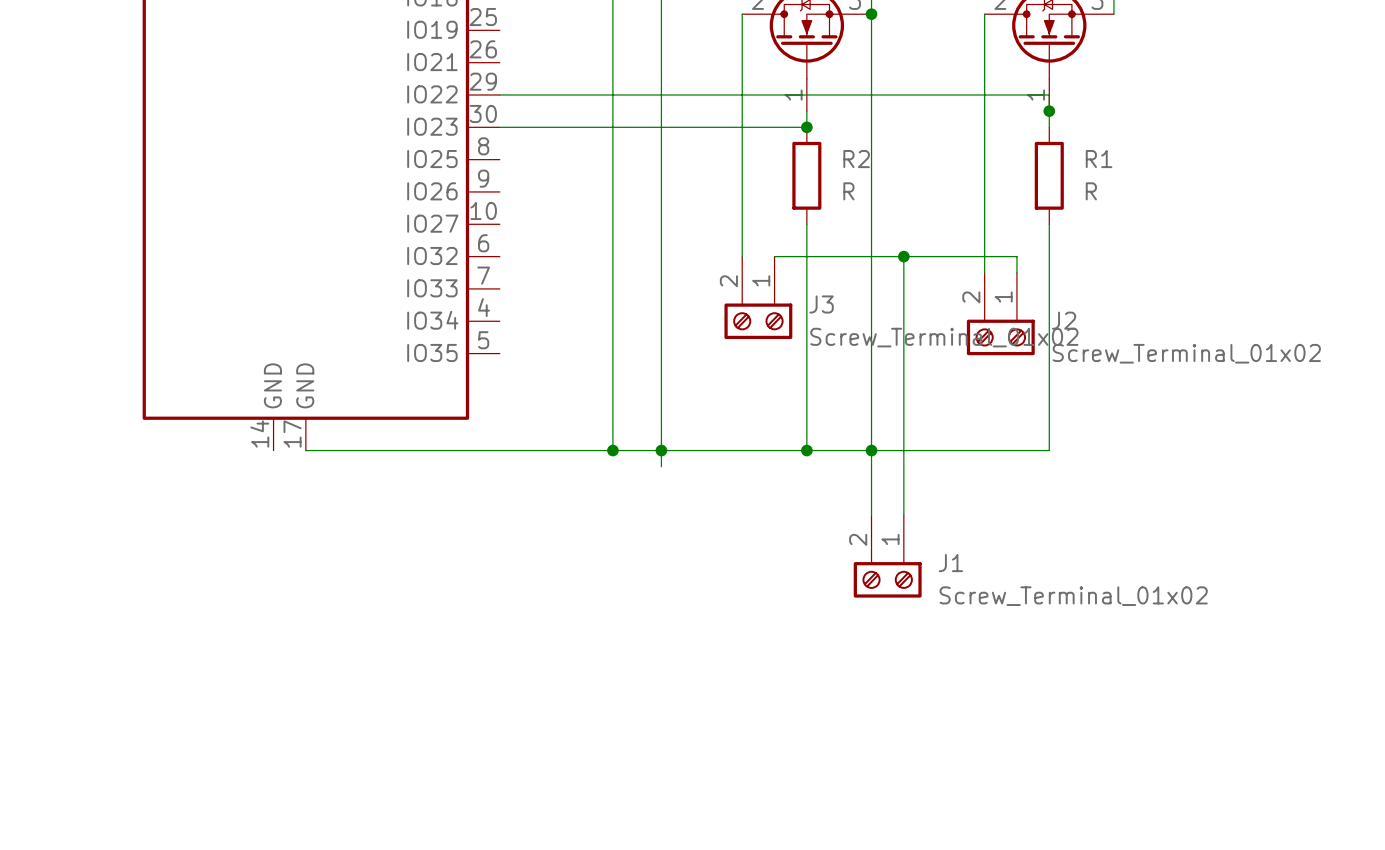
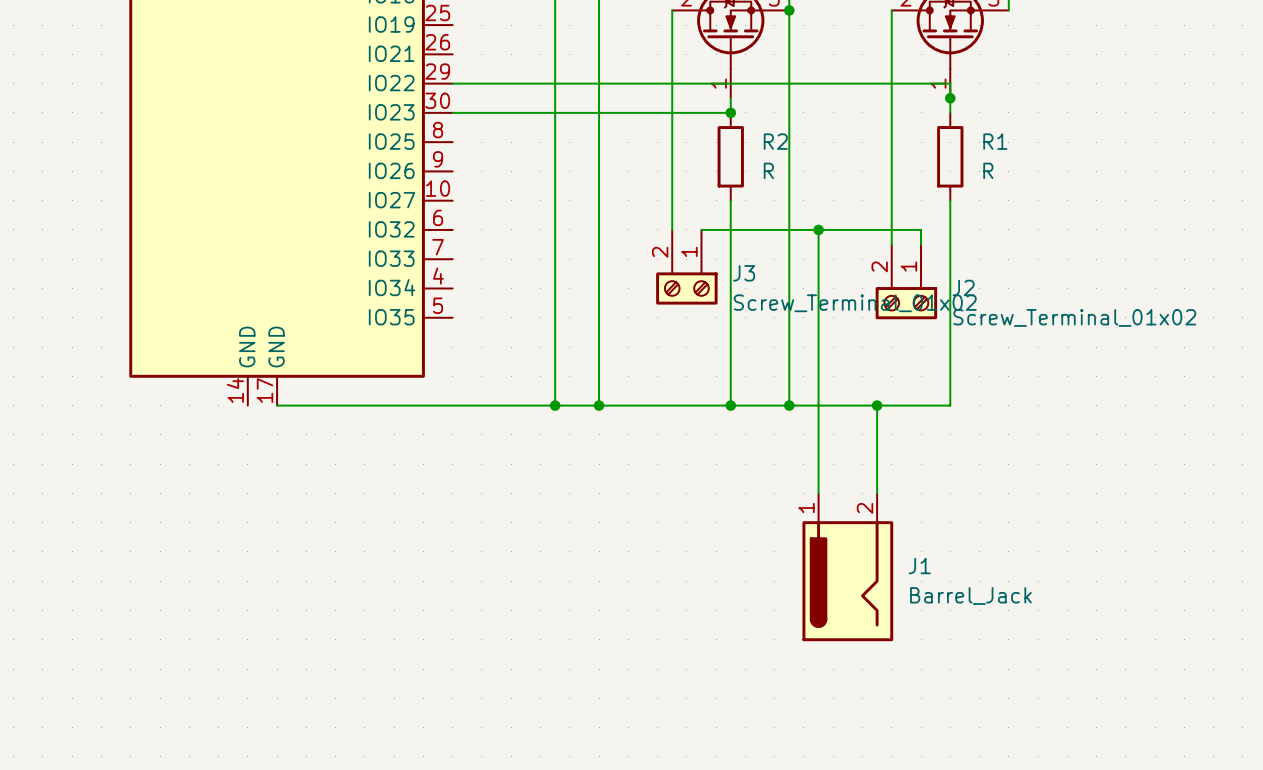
wire: (661, 450) (661, 466) -> none
wire: (871, 450) (871, 515) -> none
wire: none -> (877, 405) (877, 493)
junction: none -> (877, 405)
J1 symbol: [853, 515, 922, 598] -> [802, 493, 894, 642]
J1 value: Screw_Terminal_01x02 (1073, 596) -> Barrel_Jack (970, 595)

